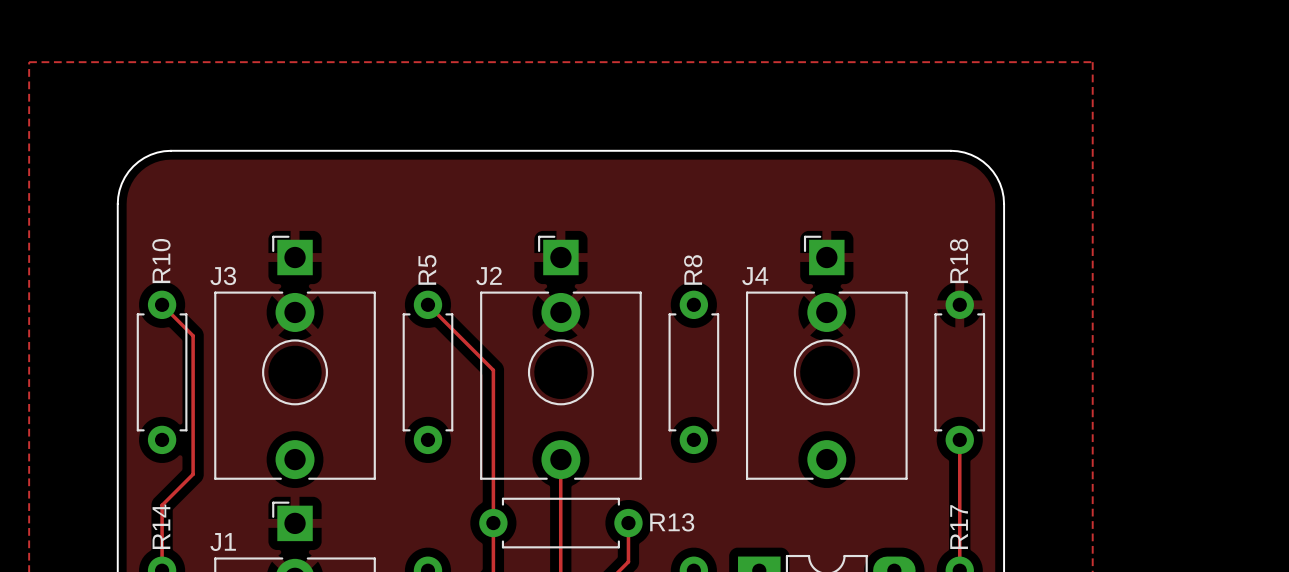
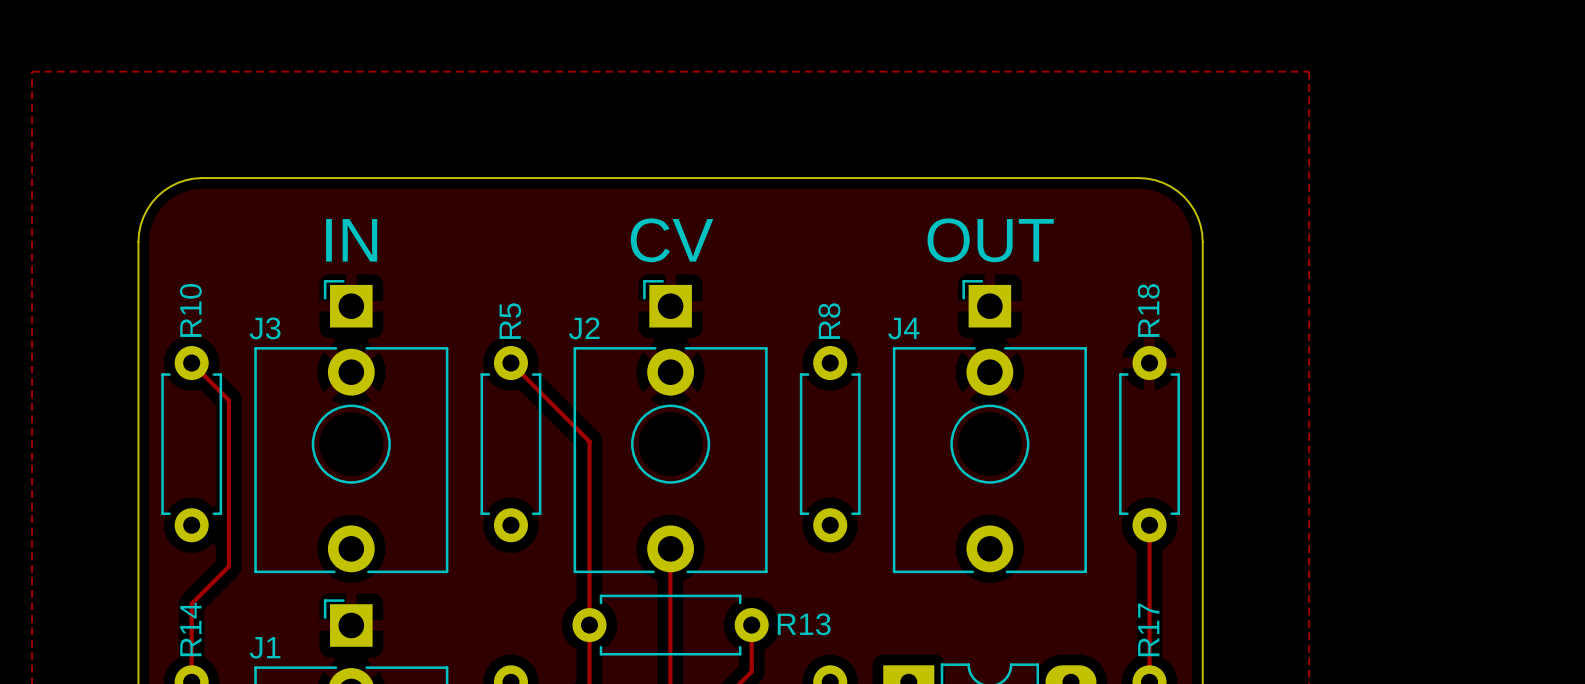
text: none -> IN (351, 240)
text: none -> CV (672, 240)
text: none -> OUT (990, 240)

